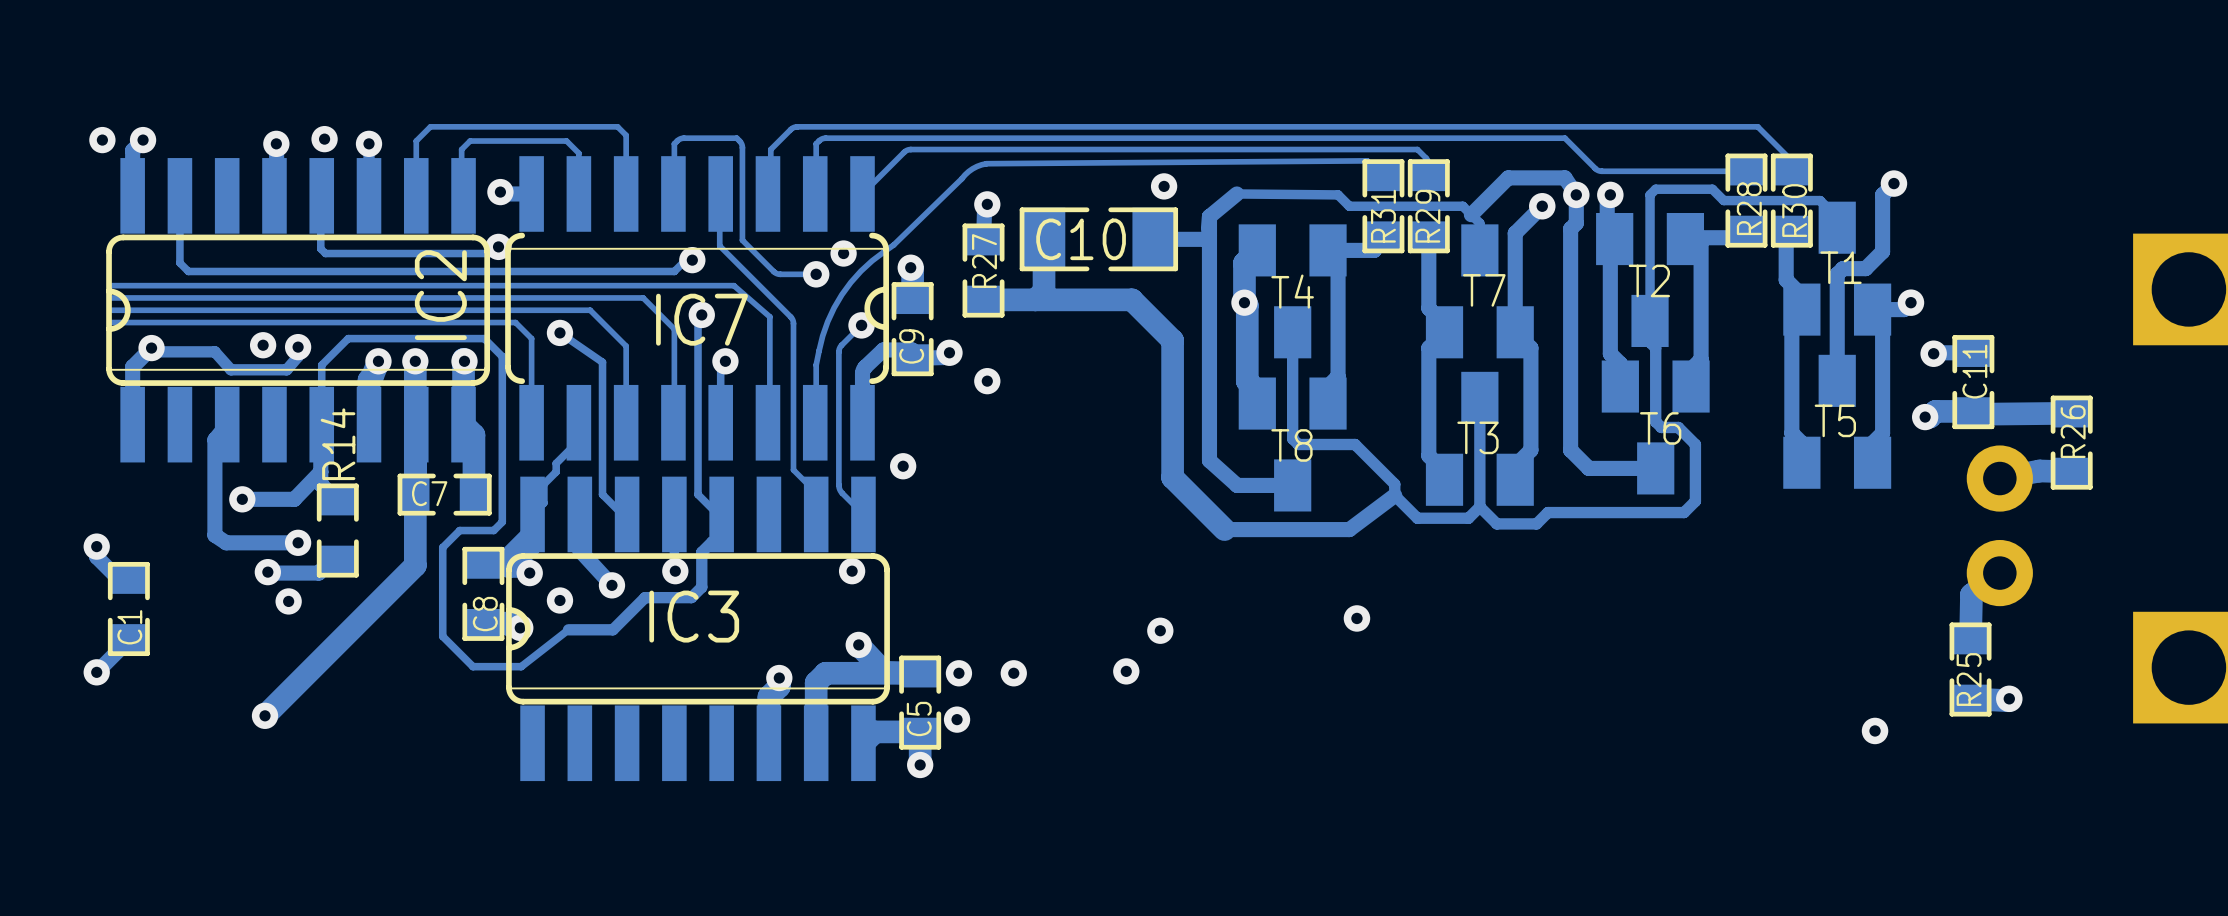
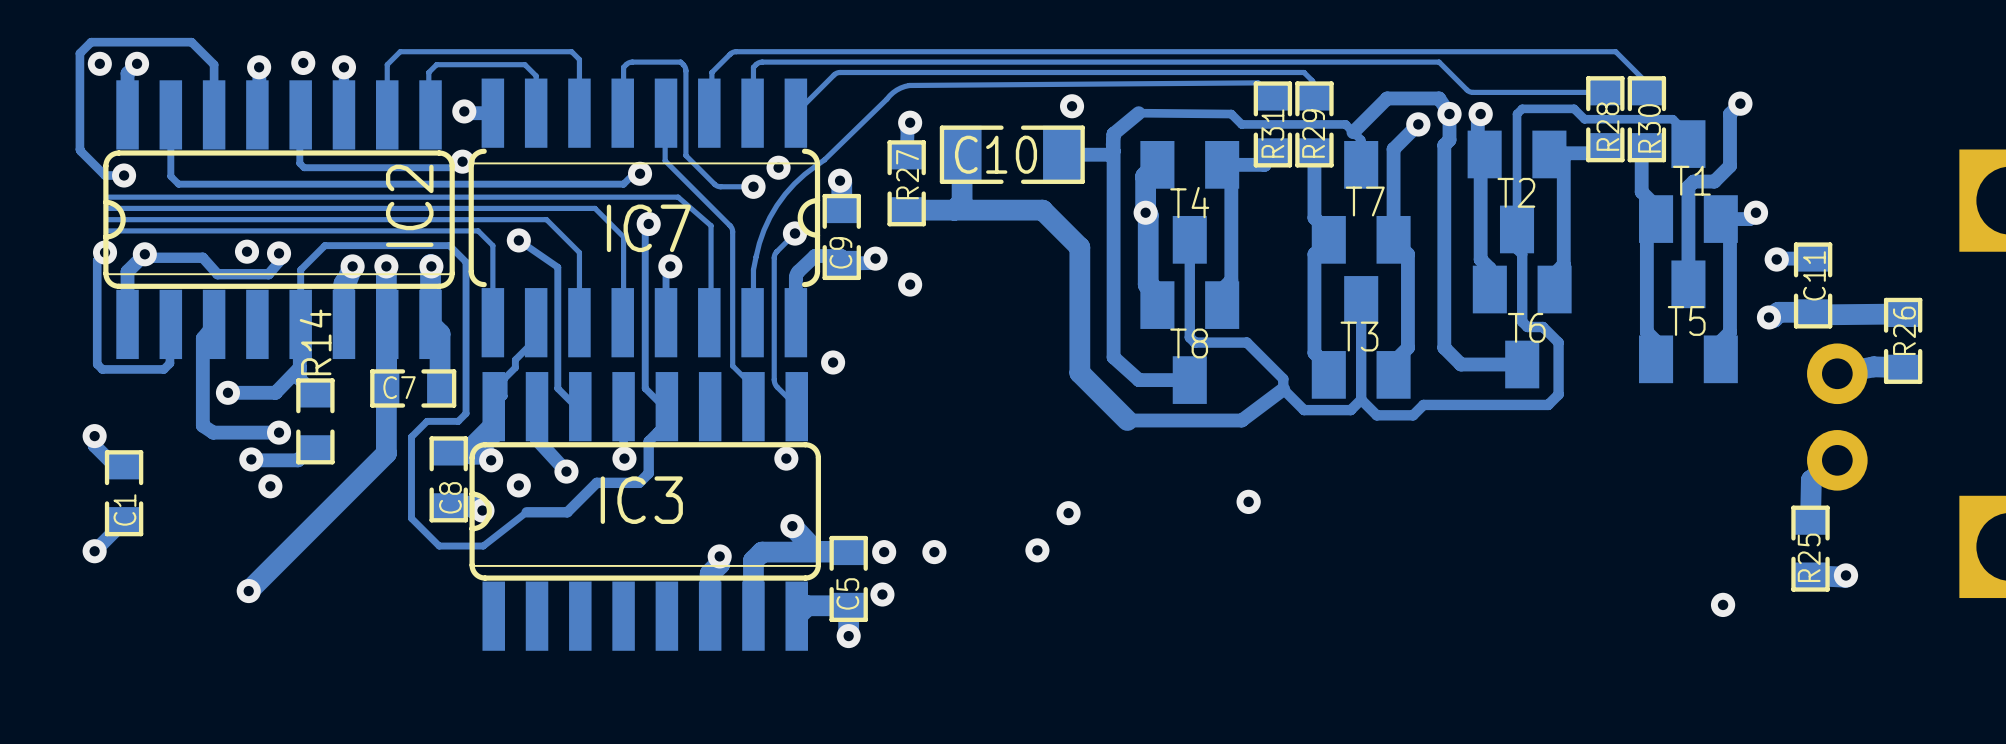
track: none -> (214, 114) (214, 64) (191, 42) (91, 42) (79, 53) (79, 149) (105, 175) (124, 175)
via: none -> (124, 175)
track: none -> (105, 252) (97, 260) (97, 364) (102, 369) (163, 369) (169, 363) (170, 324)
via: none -> (105, 252)

